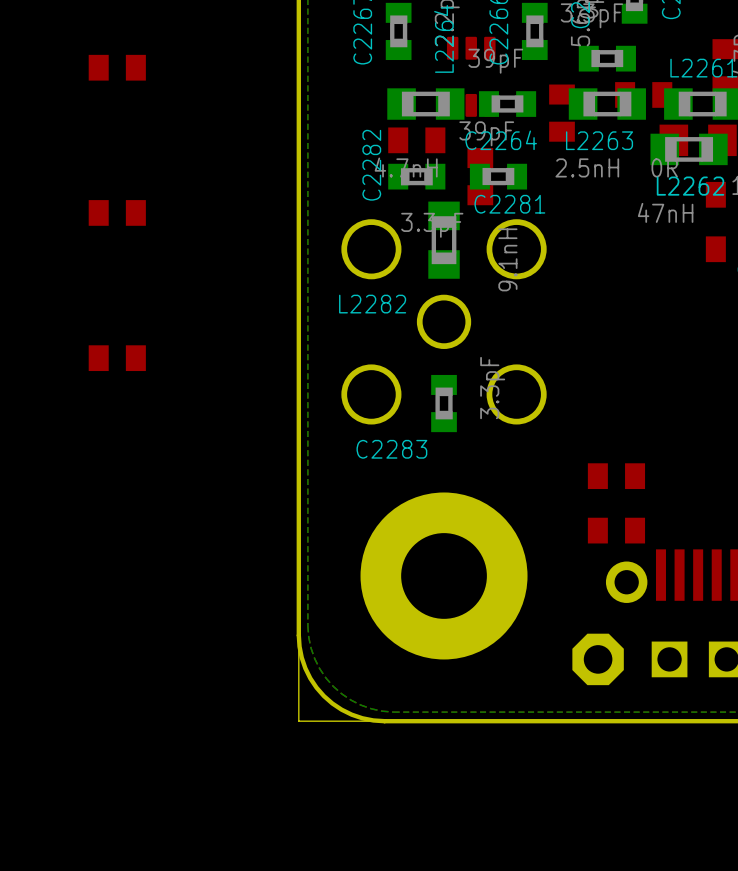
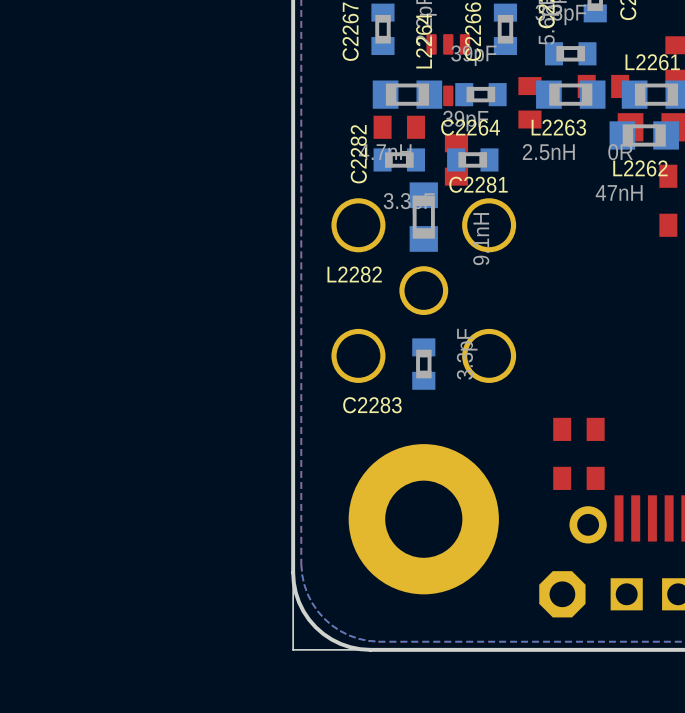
part: (117, 67) -> none
part: (117, 212) -> none
part: (117, 358) -> none

